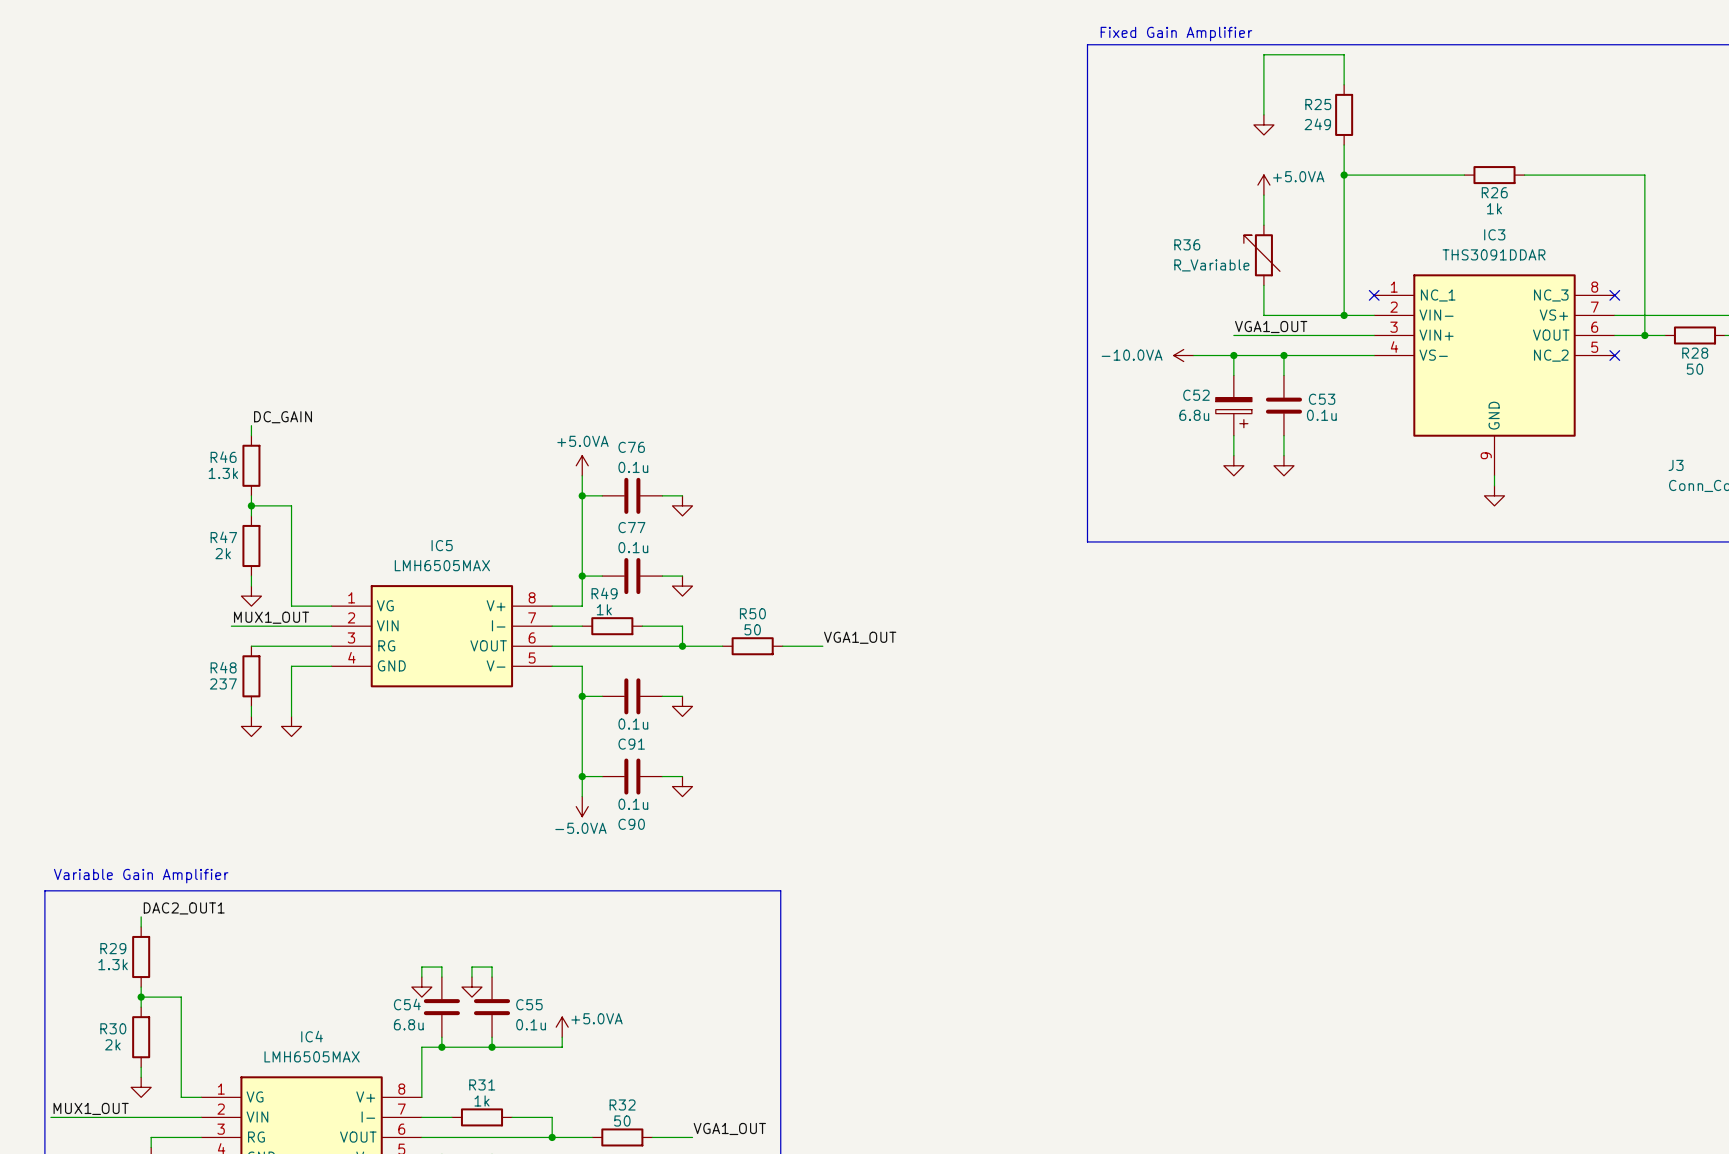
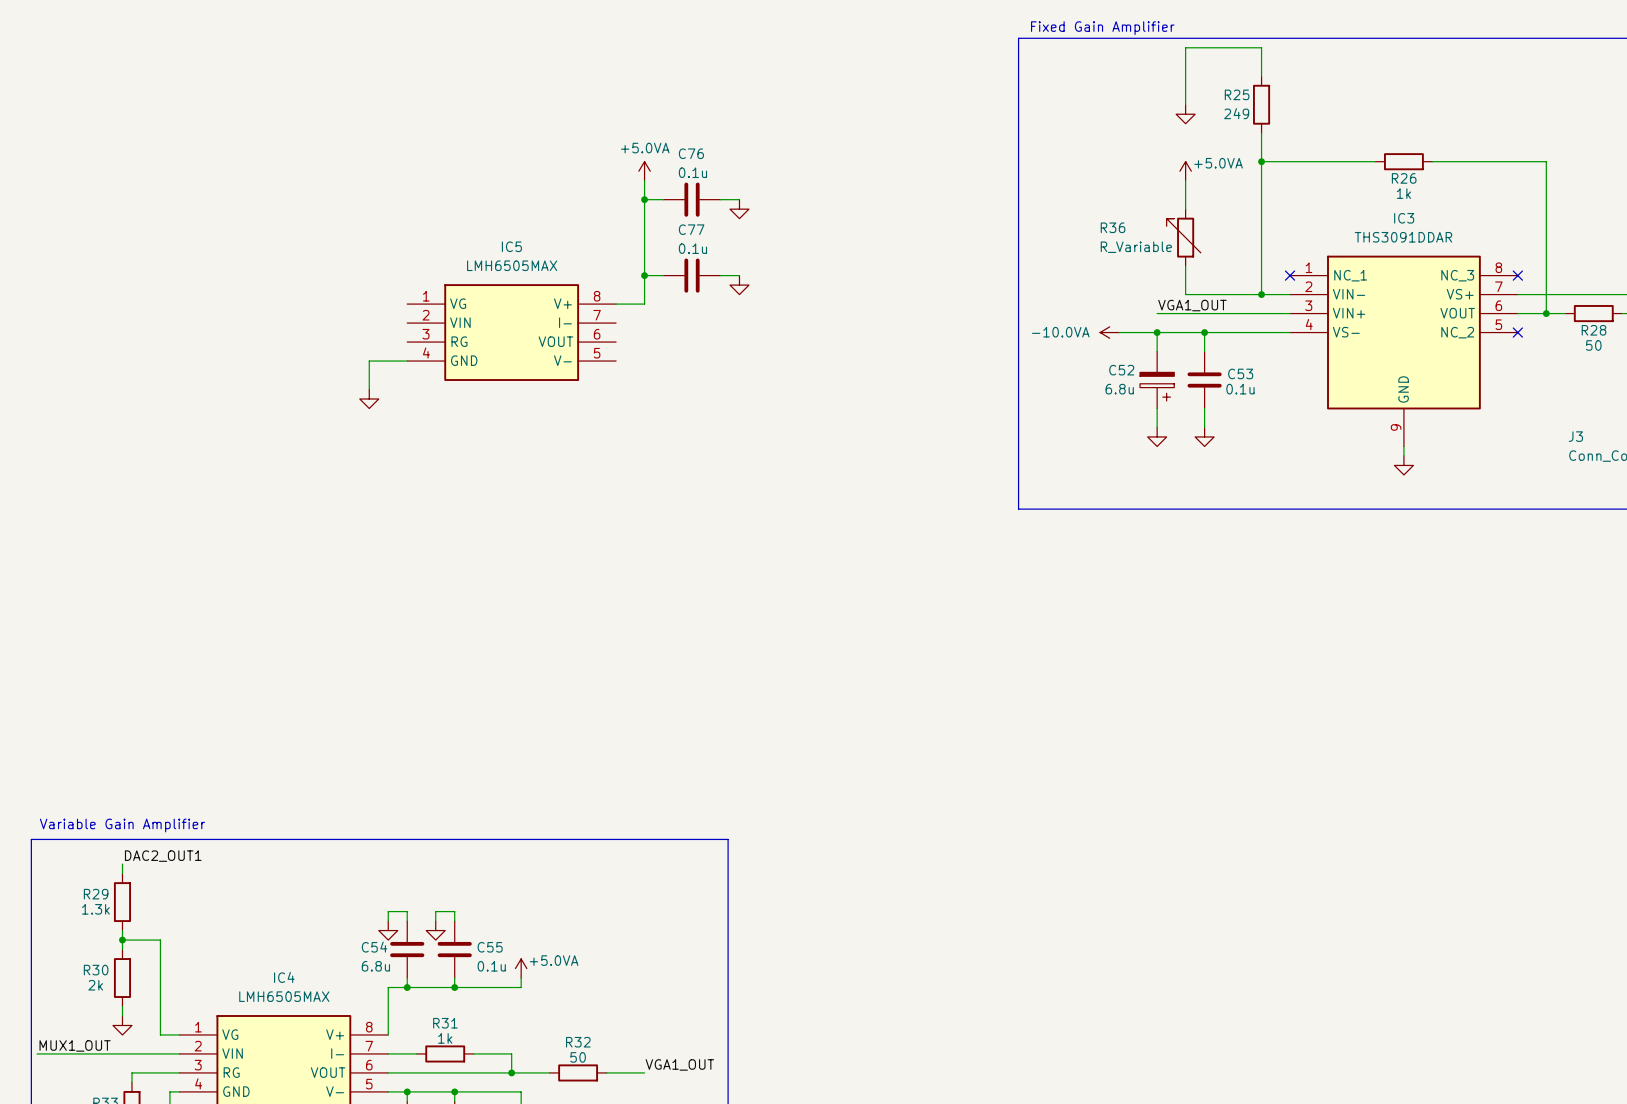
power symbol: none -> +5.0VA (644, 171)
wire: none -> (644, 180) (644, 304) (616, 304)
wire: none -> (644, 199) (663, 199)
junction: none -> (644, 199)
wire: none -> (720, 199) (739, 199)
power symbol: none -> (739, 209)
wire: none -> (644, 275) (663, 275)
junction: none -> (644, 275)
wire: none -> (720, 275) (739, 275)
power symbol: none -> (739, 285)
wire: none -> (407, 361) (369, 361) (369, 389)
label: DC_GAIN (283, 417) -> none
wire: (251, 425) (251, 435) -> none
power symbol: none -> (369, 399)
R46: 1.3k (251, 465) -> none
power symbol: +5.0VA (582, 465) -> none
wire: (582, 475) (582, 606) (552, 606) -> none
wire: (251, 495) (251, 515) -> none
wire: (582, 495) (602, 495) -> none
junction: (582, 495) -> none
C76 position: (632, 495) -> (692, 199)
wire: (662, 495) (682, 495) -> none
wire: (251, 505) (291, 505) (291, 606) (331, 606) -> none
junction: (251, 505) -> none
power symbol: (682, 505) -> none
R47: 2k (251, 545) -> none
wire: (251, 576) (251, 586) -> none
wire: (582, 576) (602, 576) -> none
junction: (582, 576) -> none
C77 position: (632, 576) -> (692, 275)
wire: (662, 576) (682, 576) -> none
power symbol: (682, 586) -> none
power symbol: (251, 596) -> none
label: MUX1_OUT (271, 617) -> none
wire: (231, 626) (331, 626) -> none
wire: (552, 626) (582, 626) -> none
R49: 1k (612, 626) -> none
wire: (642, 626) (682, 626) (682, 646) -> none
IC5 position: (441, 636) -> (511, 332)
label: VGA1_OUT (860, 637) -> none
wire: (251, 646) (331, 646) -> none
wire: (552, 646) (722, 646) -> none
junction: (682, 646) -> none
R50: 50 (752, 646) -> none
wire: (782, 646) (822, 646) -> none
wire: (331, 666) (291, 666) (291, 716) -> none
wire: (552, 666) (582, 666) (582, 796) -> none
R48: 237 (251, 676) -> none
wire: (582, 696) (602, 696) -> none
junction: (582, 696) -> none
C91: 0.1u (632, 696) -> none
wire: (662, 696) (682, 696) -> none
wire: (251, 706) (251, 716) -> none
power symbol: (682, 706) -> none
power symbol: (251, 726) -> none
power symbol: (291, 726) -> none
wire: (582, 776) (602, 776) -> none
junction: (582, 776) -> none
C90: 0.1u (632, 776) -> none
wire: (662, 776) (682, 776) -> none
power symbol: (682, 786) -> none
power symbol: -5.0VA (582, 806) -> none

